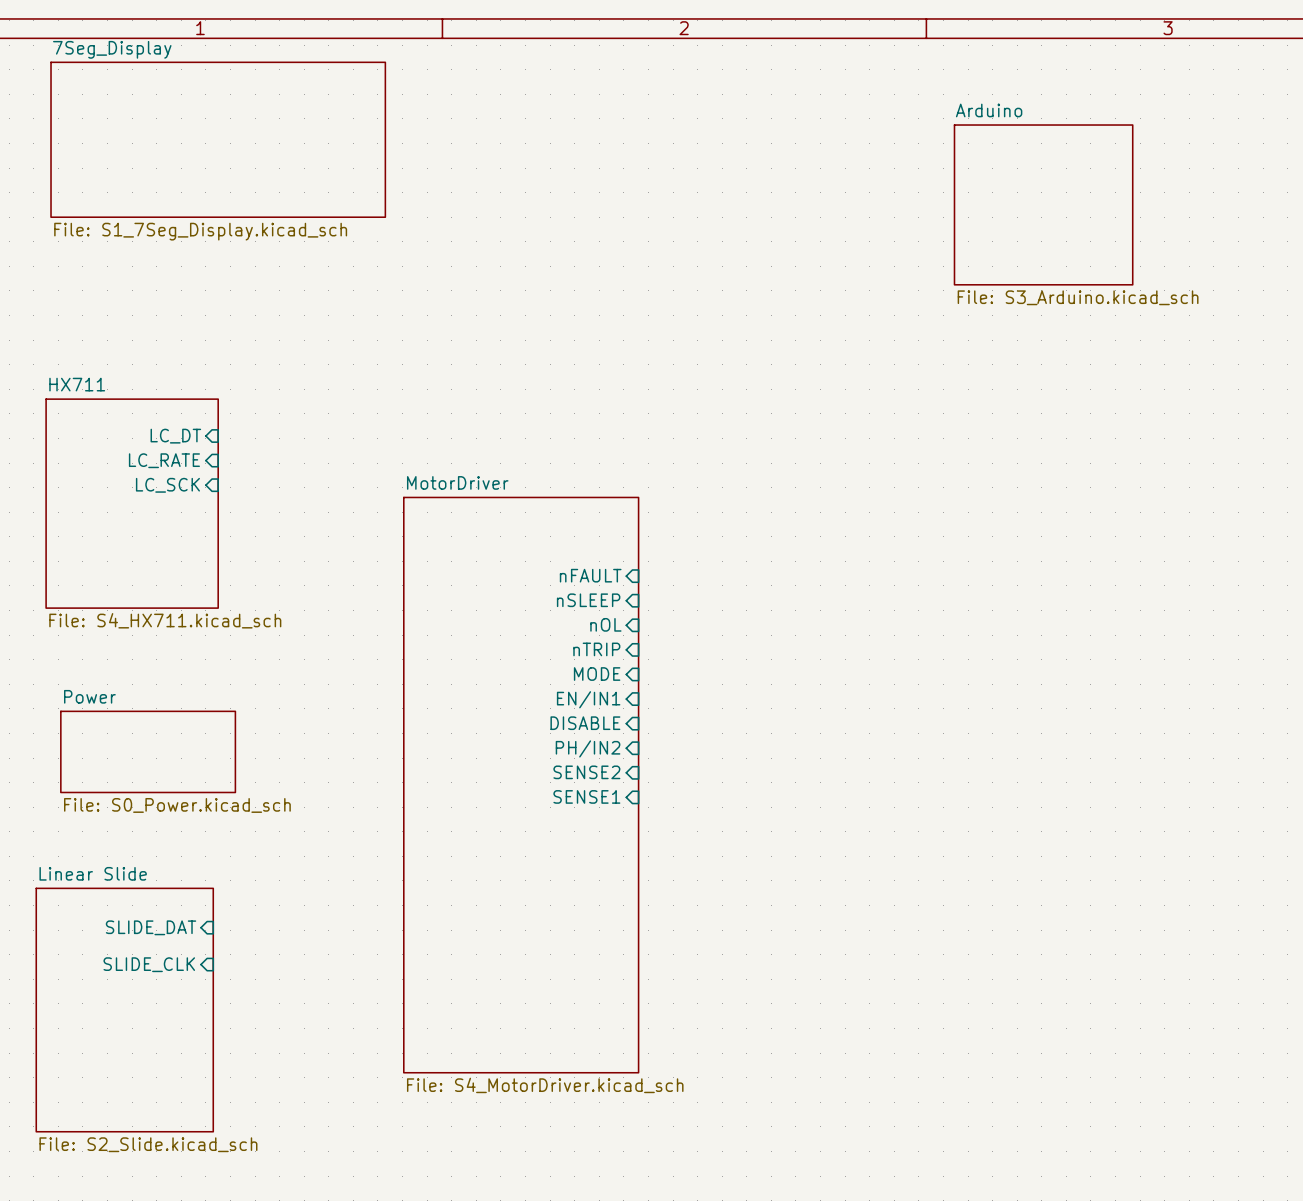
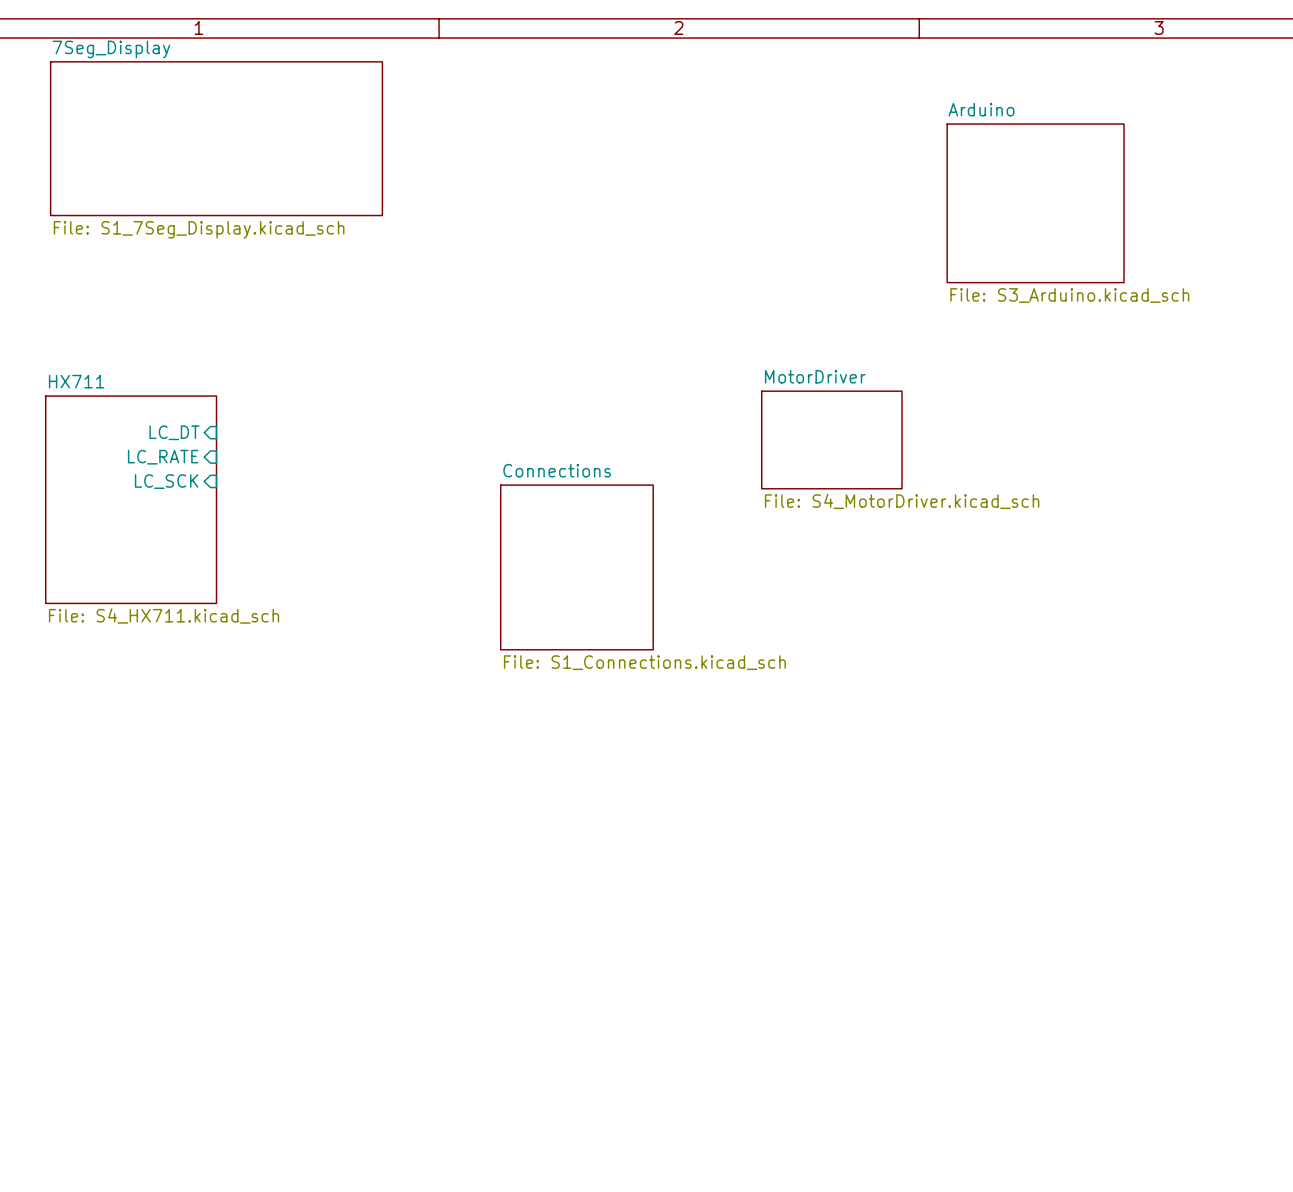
sheet MotorDriver: none -> File: S4_MotorDriver.kicad_sch (831, 439)
sheet Connections: none -> File: S1_Connections.kicad_sch (576, 567)
sheet pin: nFAULT (590, 575) -> none
sheet pin: nSLEEP (588, 600) -> none
sheet pin: nOL (605, 624) -> none
sheet pin: nTRIP (596, 649) -> none
sheet pin: MODE (597, 674) -> none
sheet pin: EN/IN1 (588, 699) -> none
sheet pin: DISABLE (585, 723) -> none
sheet pin: PH/IN2 (588, 748) -> none
sheet Power: File: S0_Power.kicad_sch (148, 751) -> none
sheet pin: SENSE2 (586, 772) -> none
sheet MotorDriver: File: S4_MotorDriver.kicad_sch (521, 785) -> none
sheet pin: SENSE1 (586, 796) -> none
sheet pin: SLIDE_DAT (151, 927) -> none
sheet pin: SLIDE_CLK (149, 964) -> none
sheet Linear Slide: File: S2_Slide.kicad_sch (124, 1010) -> none

